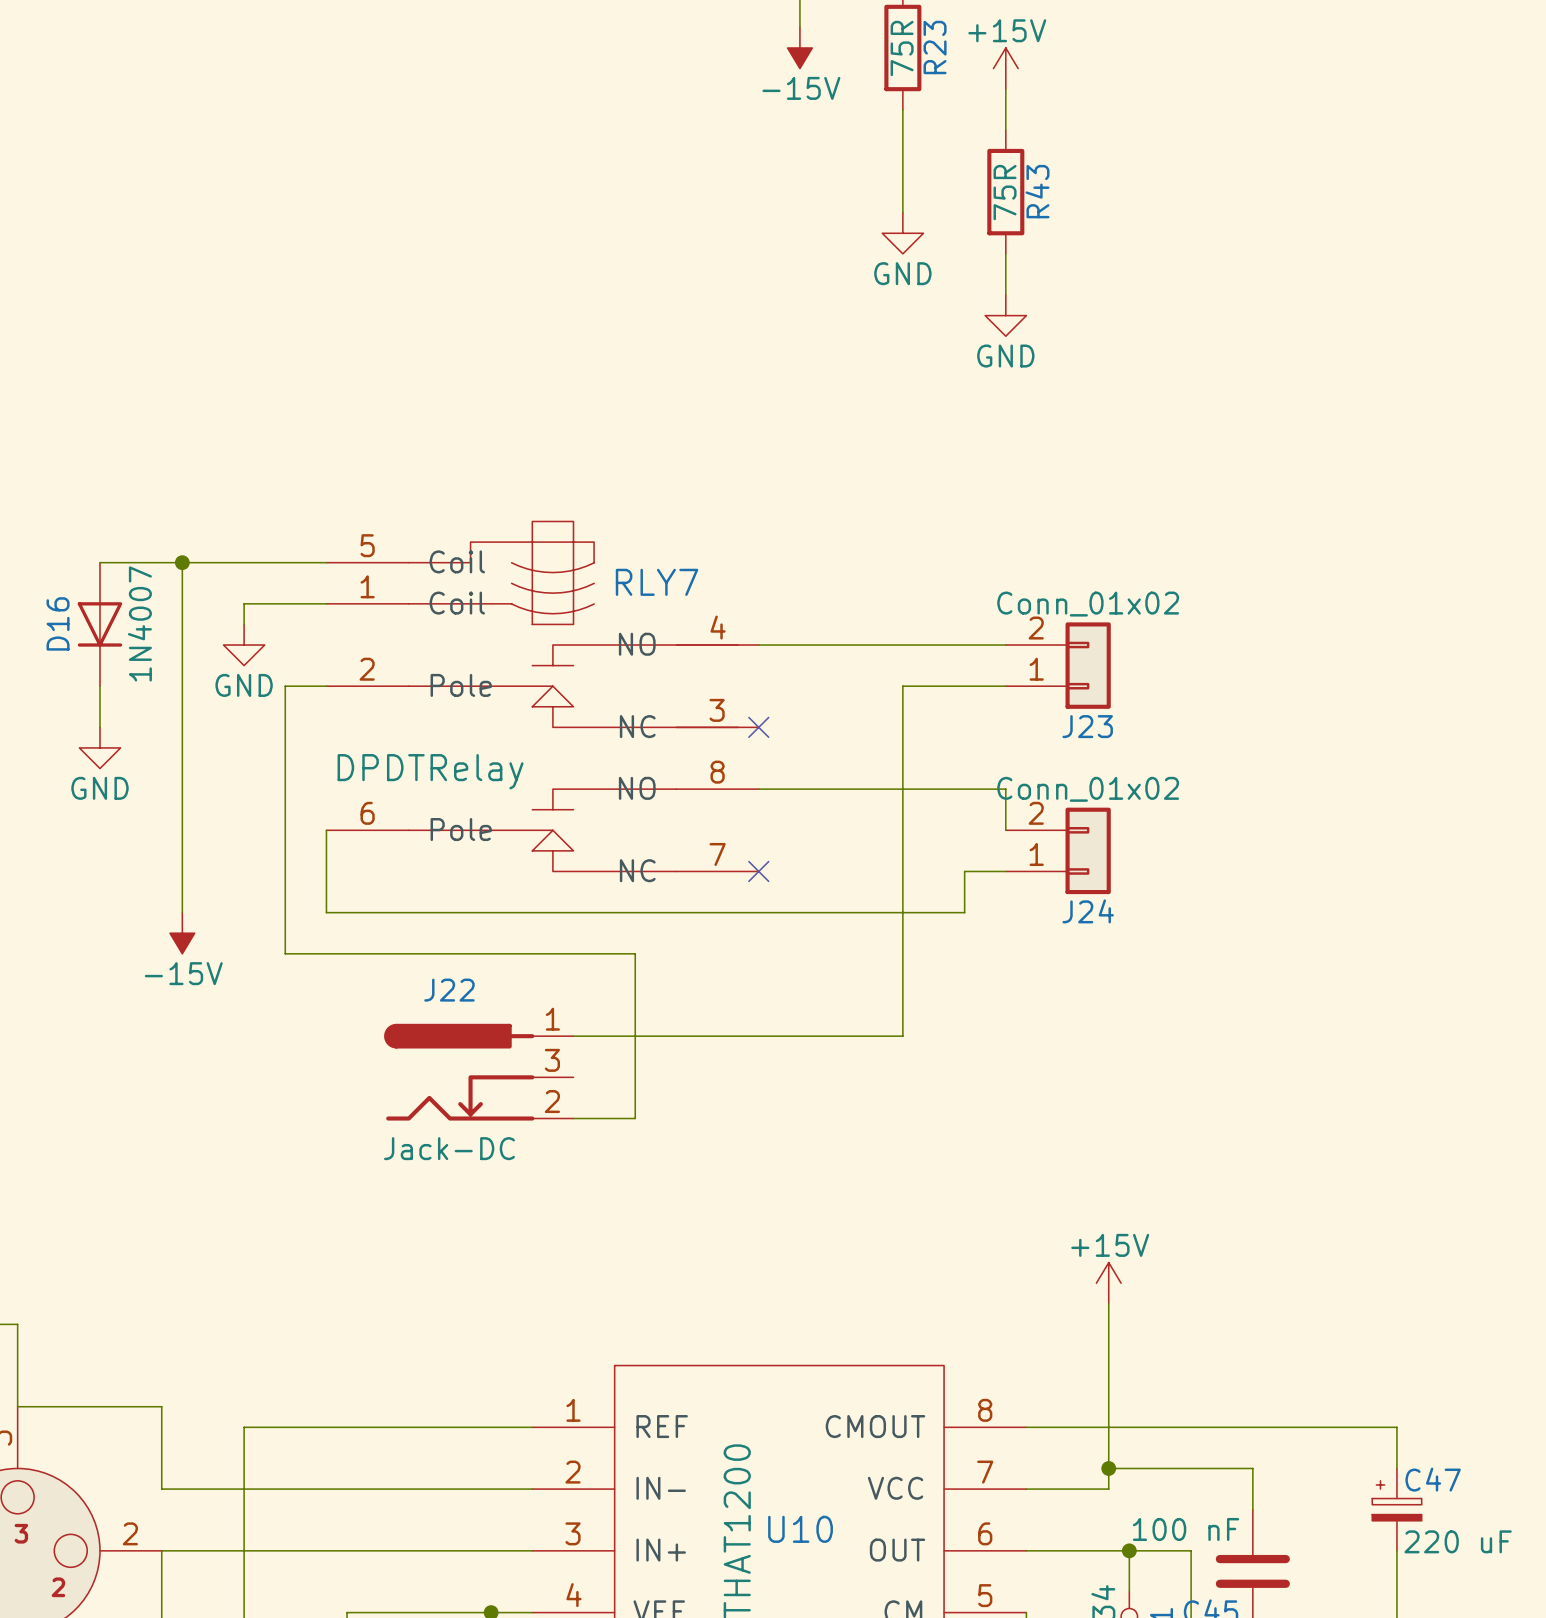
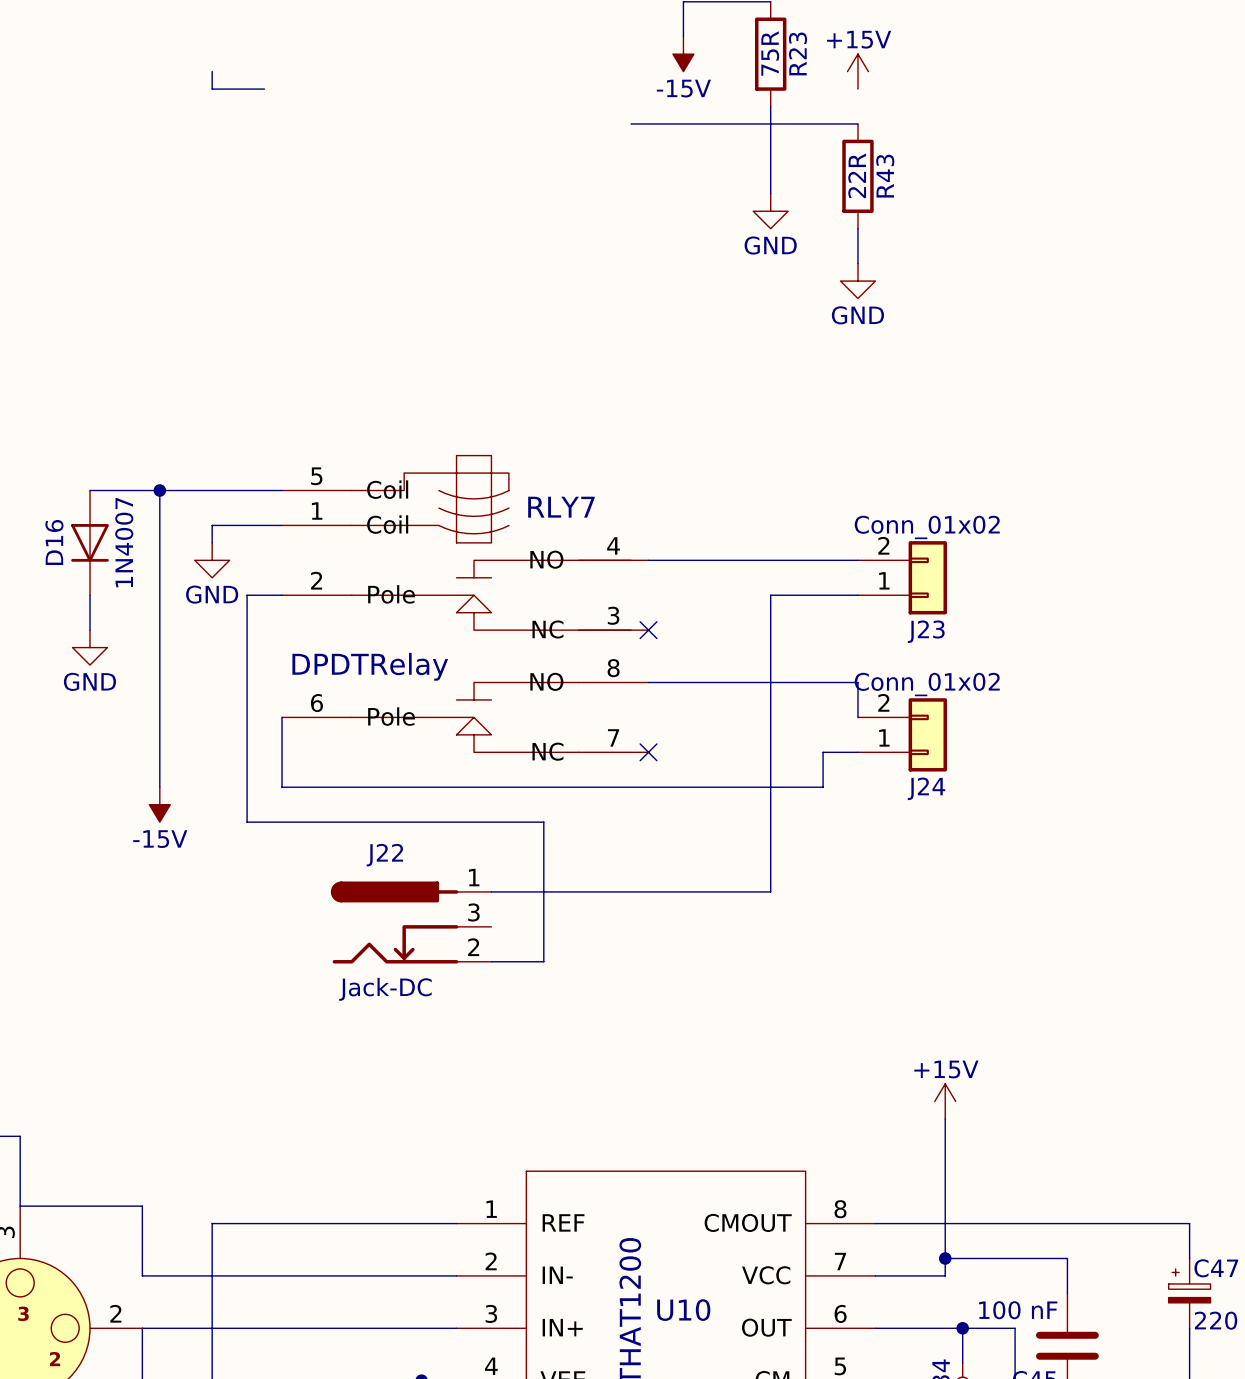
wire: none -> (212, 71) (212, 89) (264, 89)
wire: (1005, 89) (1005, 130) -> (631, 123) (857, 123)
R43 value: 75R (1005, 192) -> 22R (857, 175)

